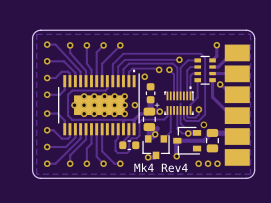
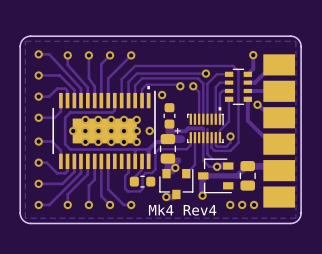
track: none -> (169, 131) (202, 128) (203, 140)
via: (159, 111) -> none
via: (203, 124) -> none

